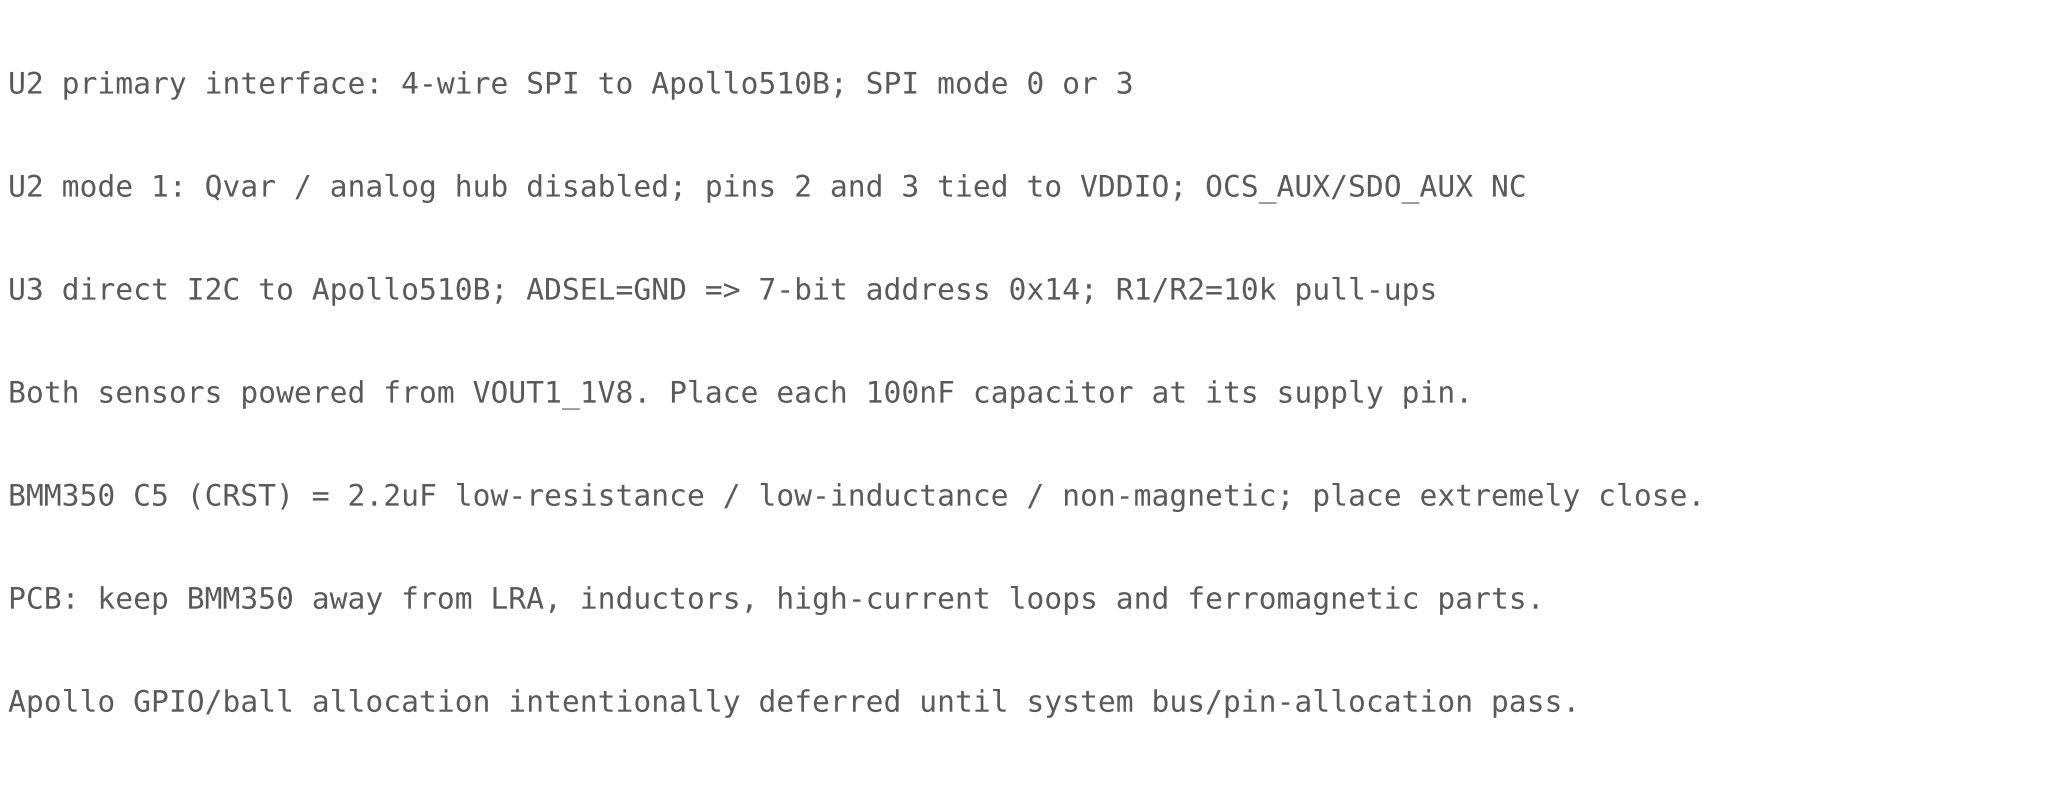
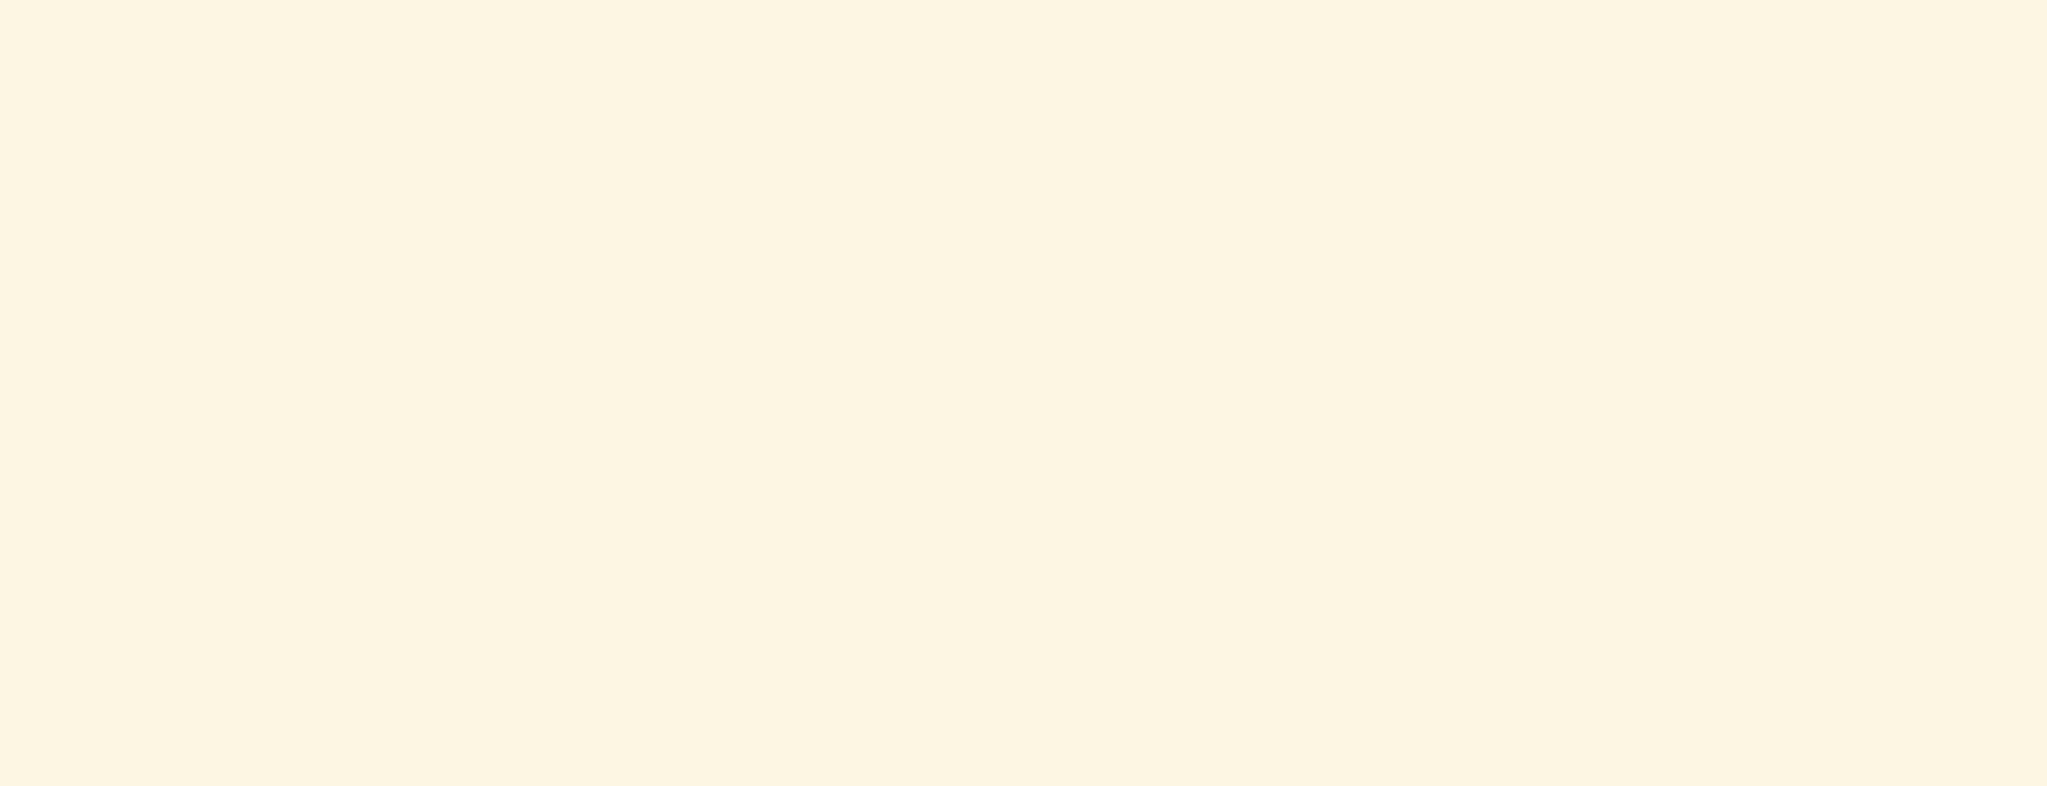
text: U2 primary interface: 4-wire SPI to Apollo510B; SPI mode 0 or 3 (570, 85) -> none
text: U2 mode 1: Qvar / analog hub disabled; pins 2 and 3 tied to VDDIO; OCS_AUX/SDO_AUX NC (767, 188) -> none
text: U3 direct I2C to Apollo510B; ADSEL=GND => 7-bit address 0x14; R1/R2=10k pull-ups (722, 291) -> none
text: Both sensors powered from VOUT1_1V8. Place each 100nF capacitor at its supply pin. (738, 394) -> none
text: BMM350 C5 (CRST) = 2.2uF low-resistance / low-inductance / non-magnetic; place extremely close. (854, 497) -> none
text: PCB: keep BMM350 away from LRA, inductors, high-current loops and ferromagnetic parts. (774, 600) -> none
text: Apollo GPIO/ball allocation intentionally deferred until system bus/pin-allocation pass. (790, 703) -> none

